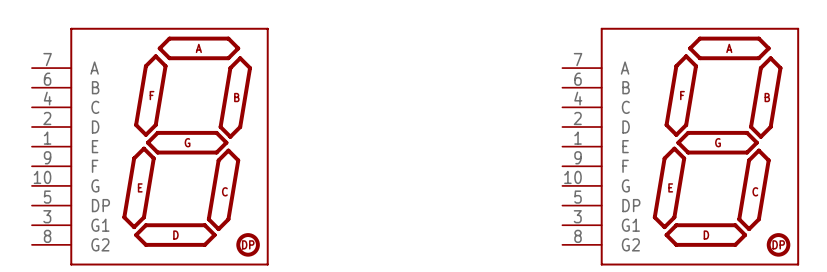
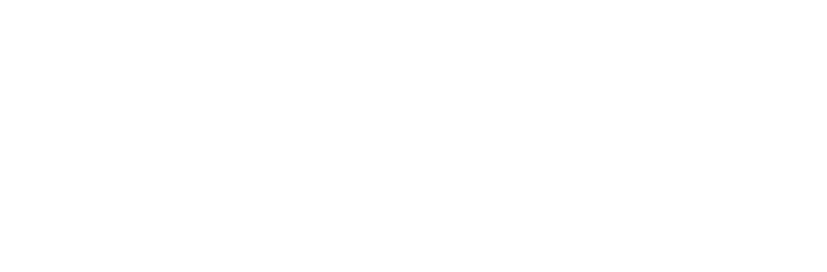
part: (150, 146) -> none
part: (680, 146) -> none

